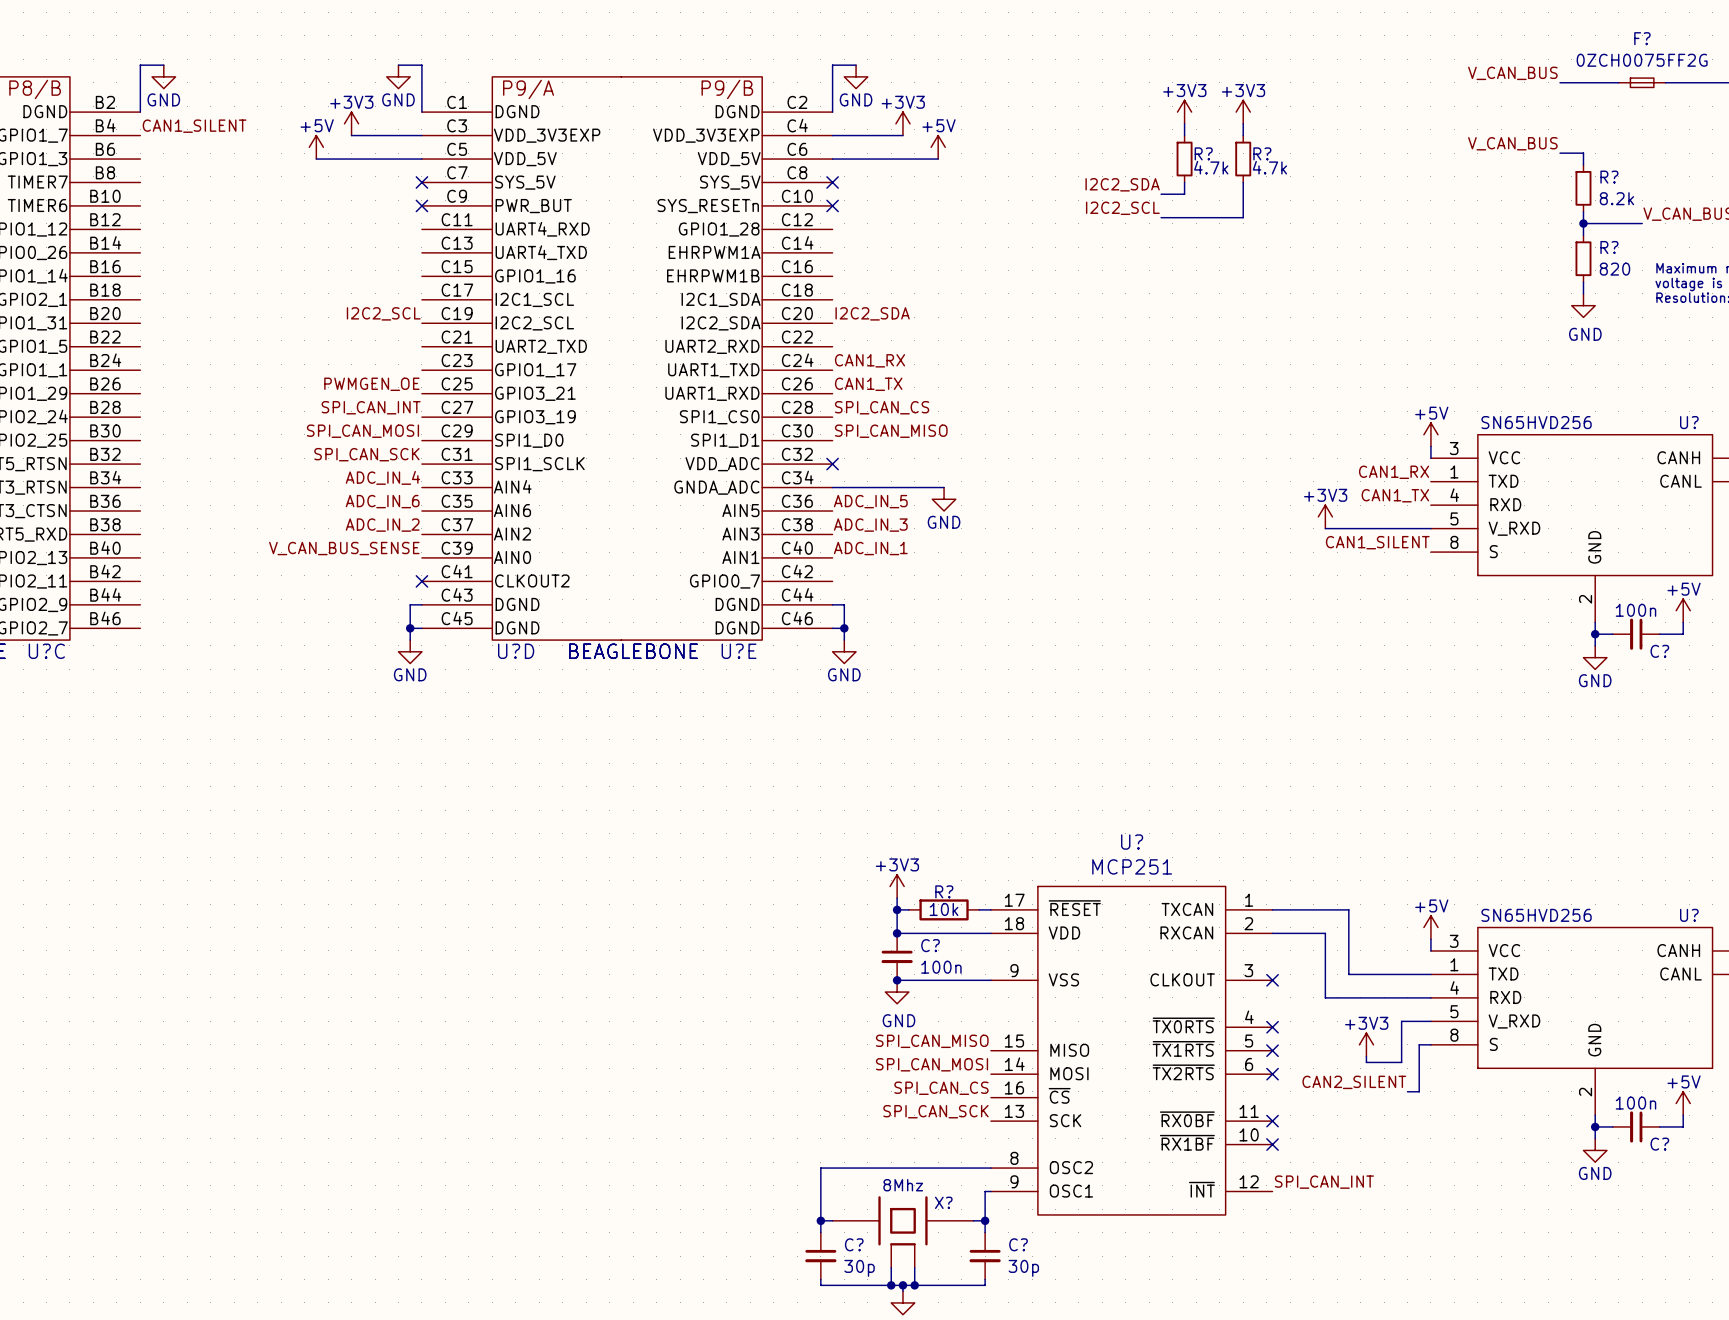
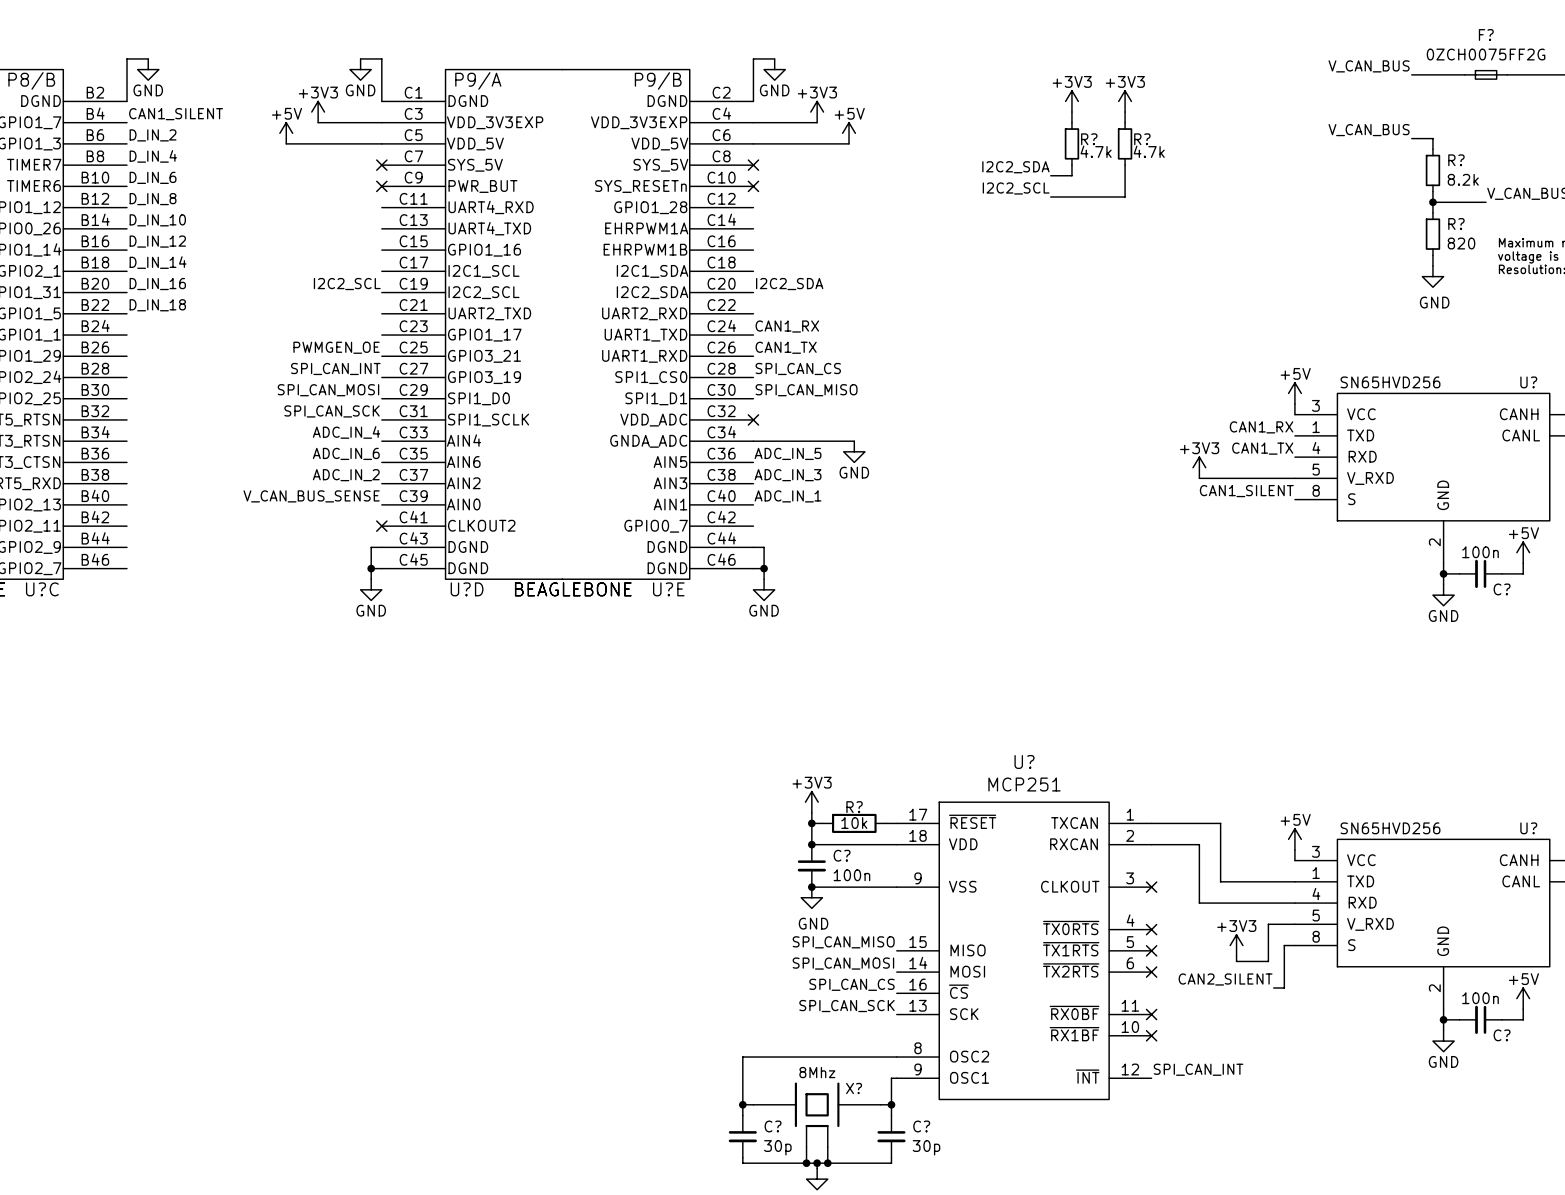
label: none -> D_IN_2 (153, 135)
label: none -> D_IN_4 (153, 156)
label: none -> D_IN_6 (153, 177)
label: none -> D_IN_8 (153, 199)
label: none -> D_IN_10 (157, 220)
label: none -> D_IN_12 (157, 241)
label: none -> D_IN_14 (158, 262)
label: none -> D_IN_16 (157, 284)
label: none -> D_IN_18 (157, 305)

